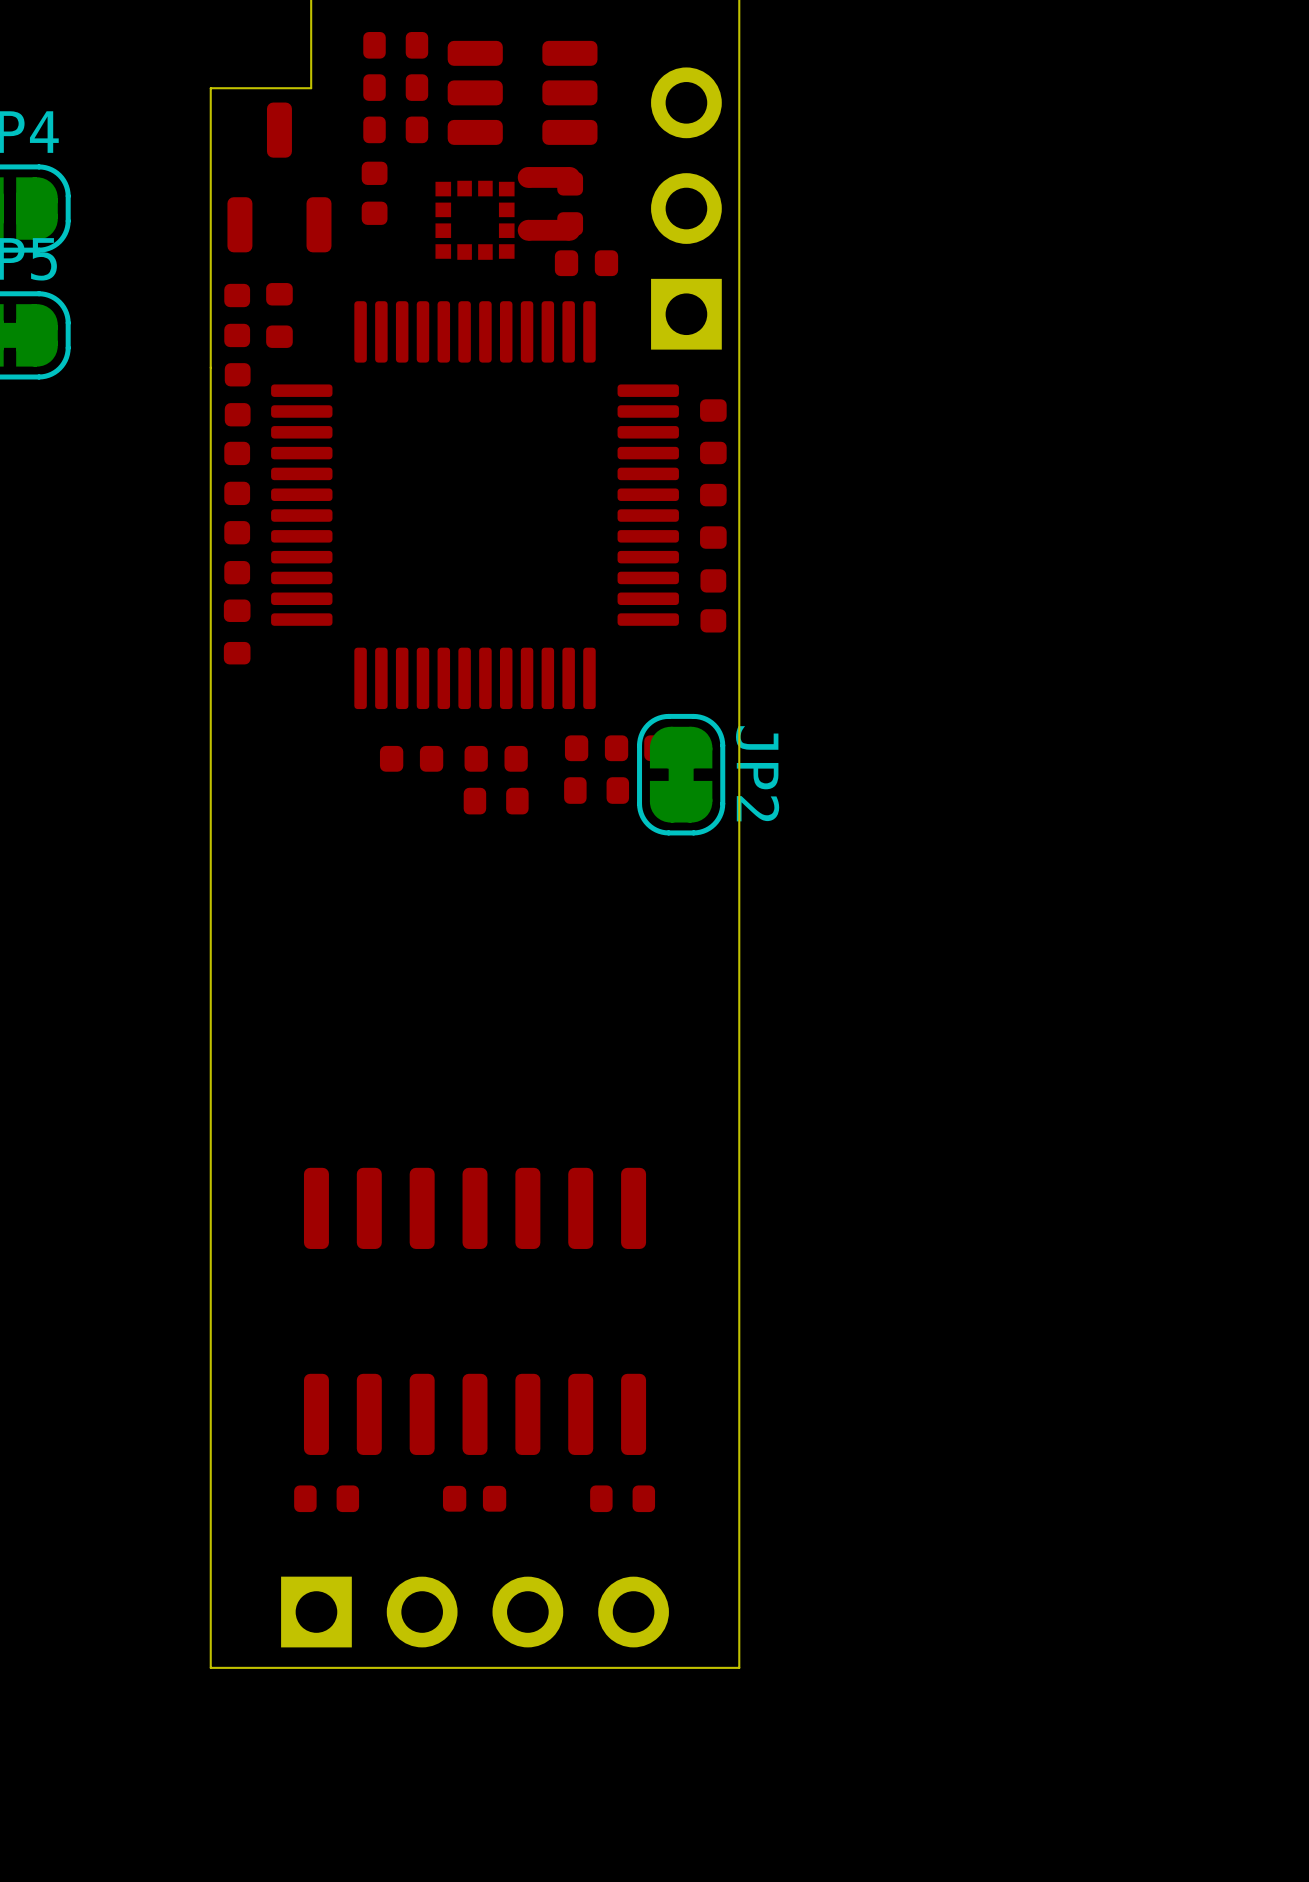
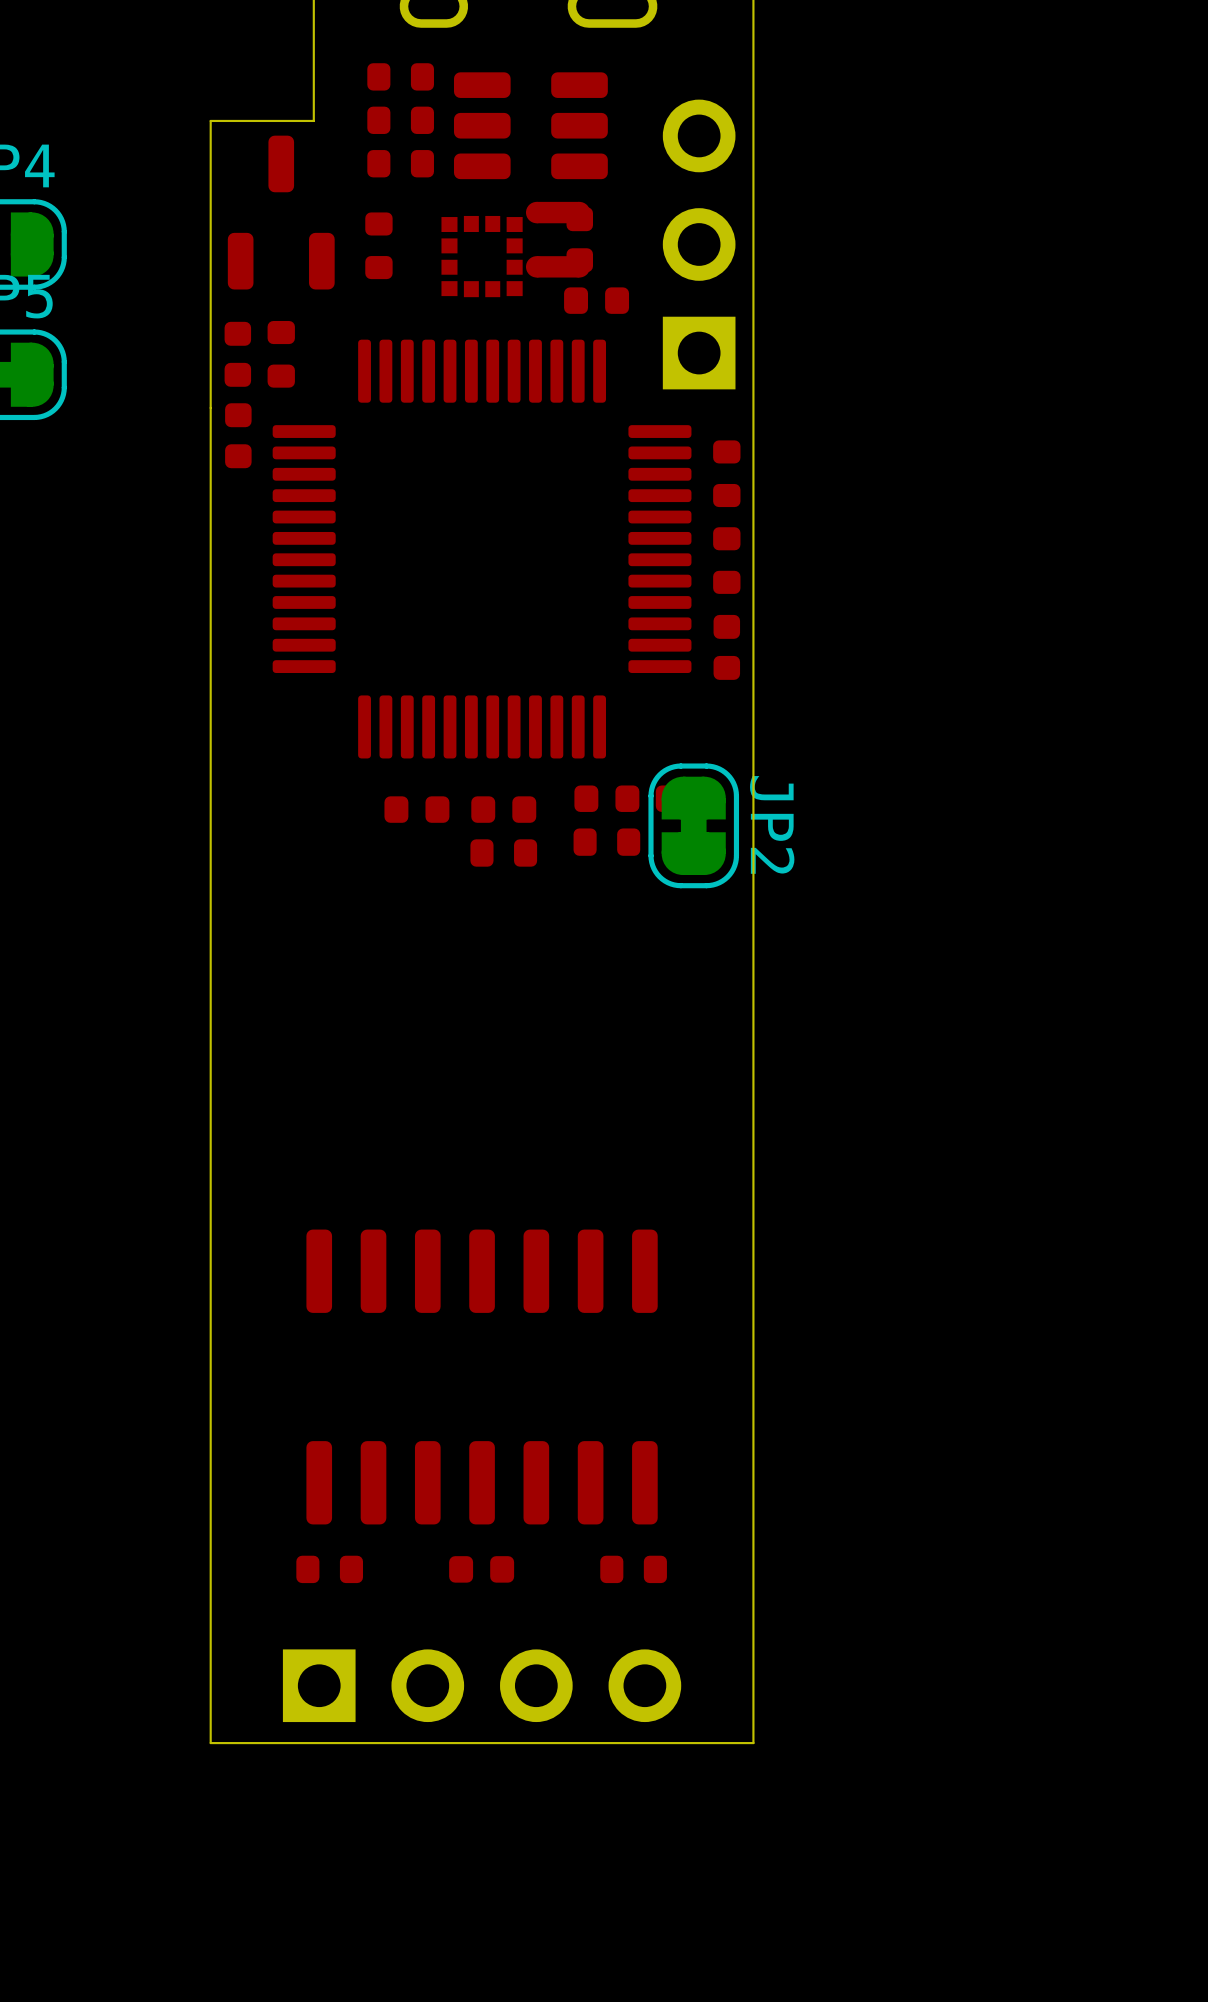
part footprint: [361, 161, 388, 225] -> [365, 212, 393, 280]
part: (237, 473) -> none
part: (237, 552) -> none
part: (237, 631) -> none

